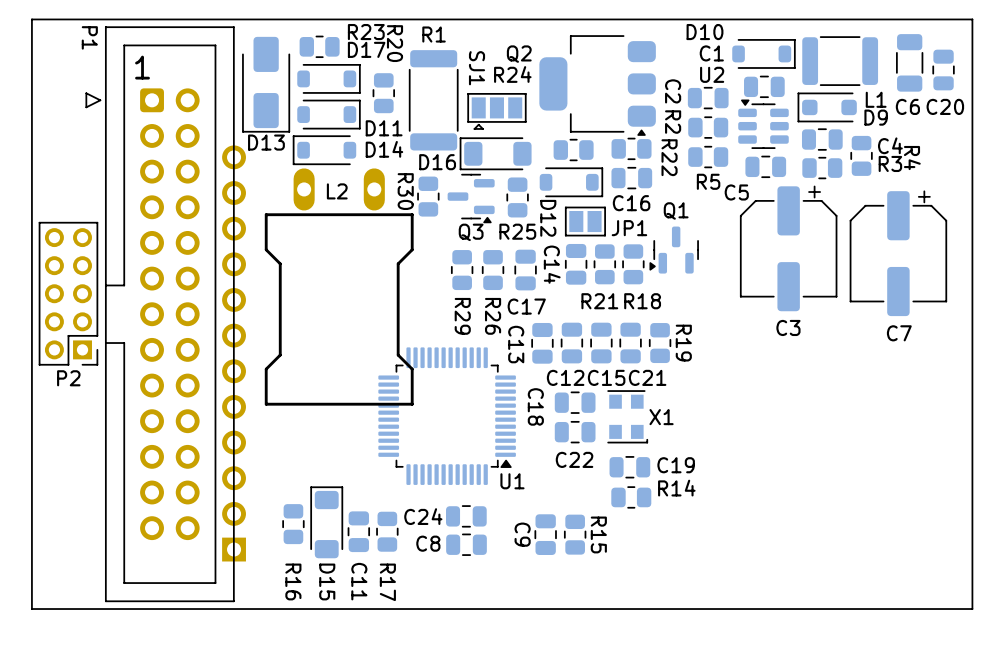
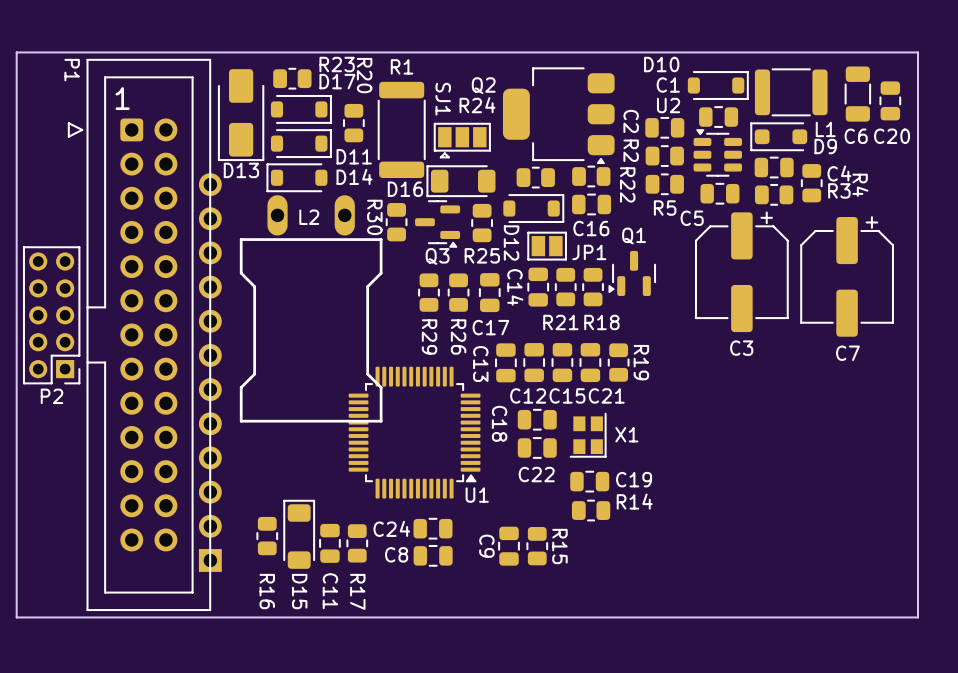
X1 footprint: [607, 390, 649, 444] -> [569, 412, 607, 458]

